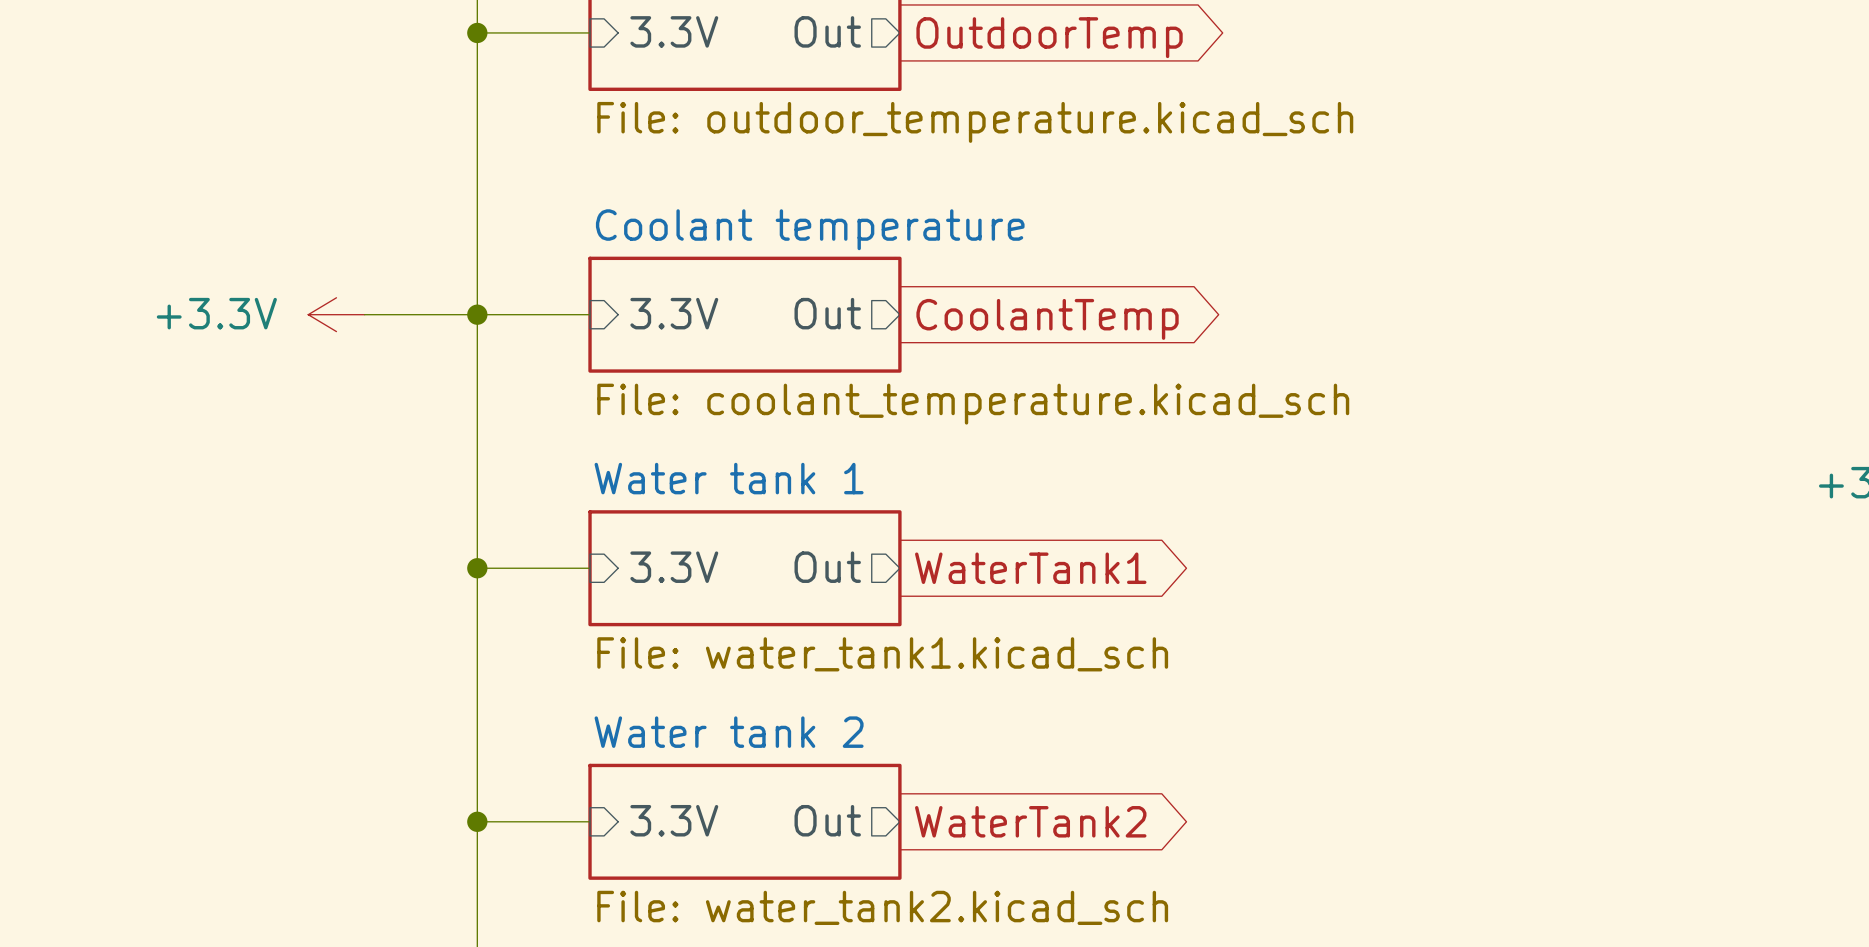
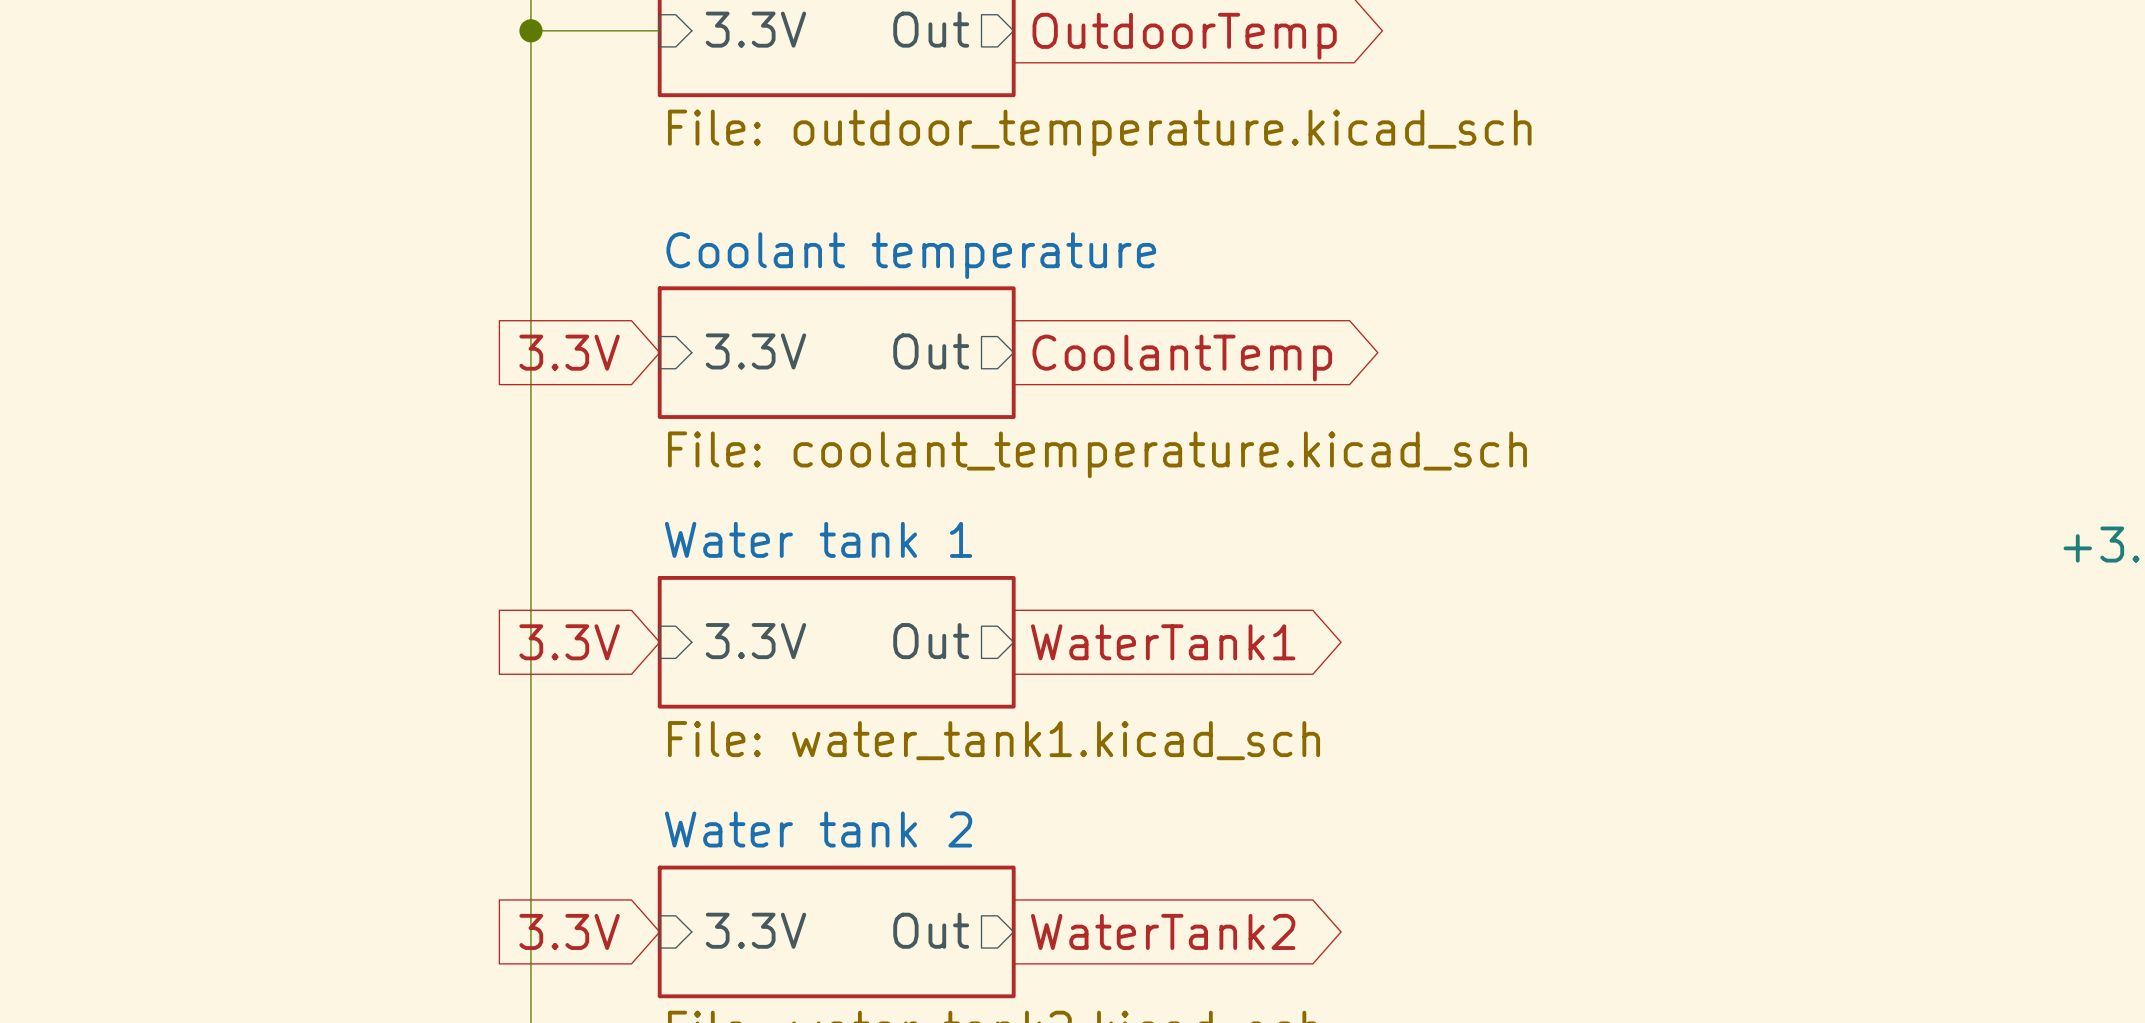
power symbol: +3.3V (336, 314) -> none
wire: (364, 314) (590, 314) -> none
junction: (477, 314) -> none
global label: none -> 3.3V (569, 352)
wire: (477, 568) (590, 568) -> none
junction: (477, 568) -> none
global label: none -> 3.3V (569, 642)
wire: (477, 821) (590, 821) -> none
junction: (477, 821) -> none
global label: none -> 3.3V (569, 931)

